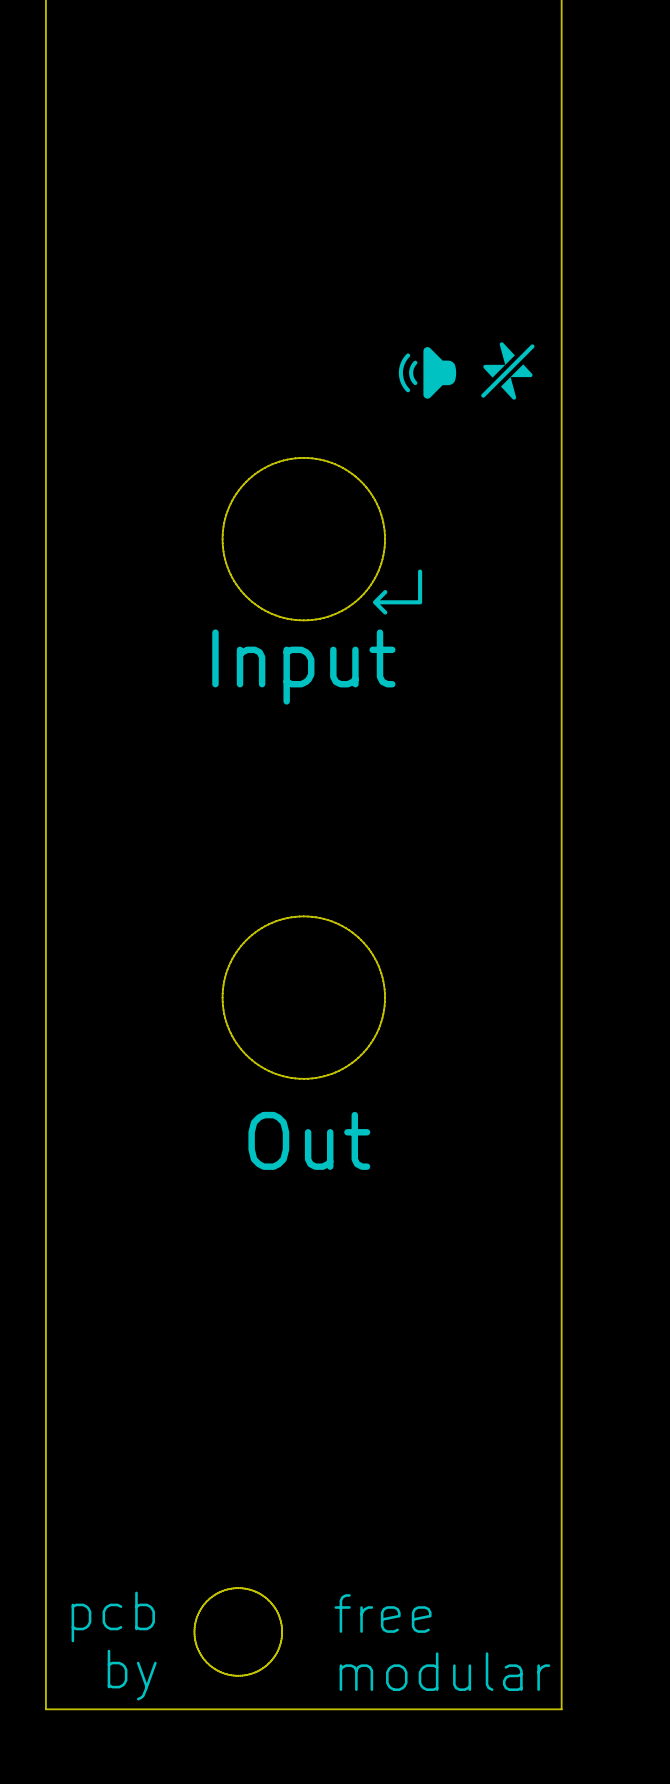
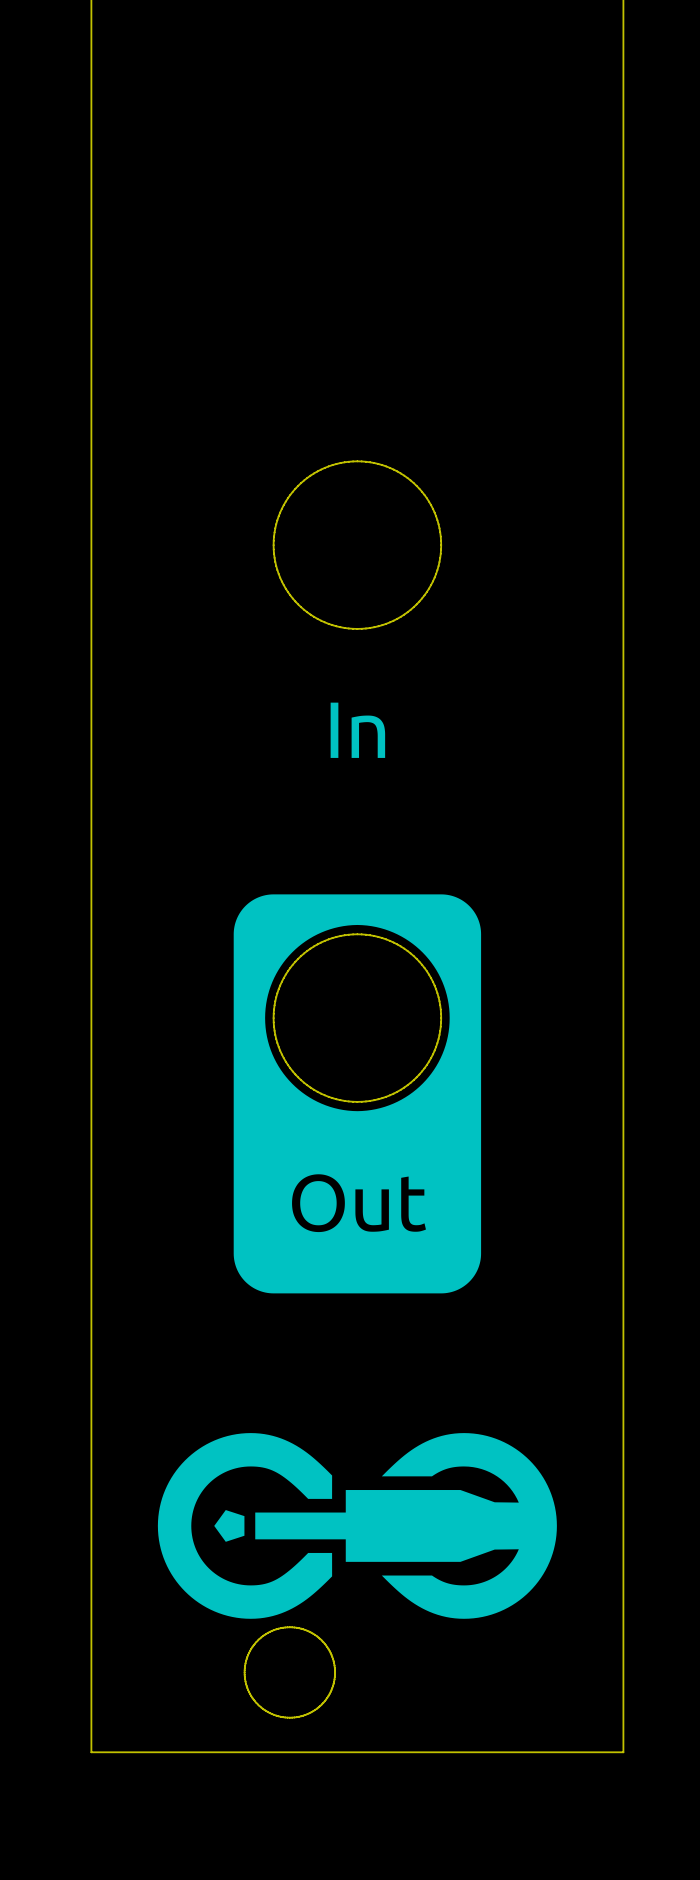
drawing: [398, 342, 535, 400] -> none
drawing: [373, 569, 423, 615] -> none
text: Input (303, 667) -> none
drawing: none -> [330, 702, 386, 758]
drawing: none -> [233, 894, 482, 1294]
text: Out (309, 1140) -> none
drawing: none -> [157, 1433, 557, 1619]
text: free (383, 1613) -> none
text: pcb (113, 1616) -> none
text: modular (444, 1671) -> none
text: by (132, 1675) -> none

